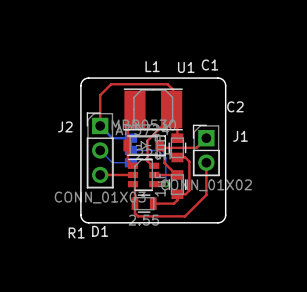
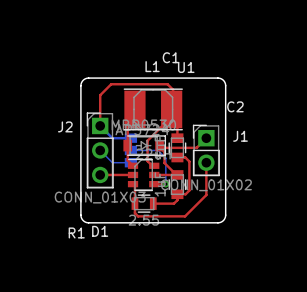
C1 name position: C1 (210, 64) -> C1 (170, 57)

